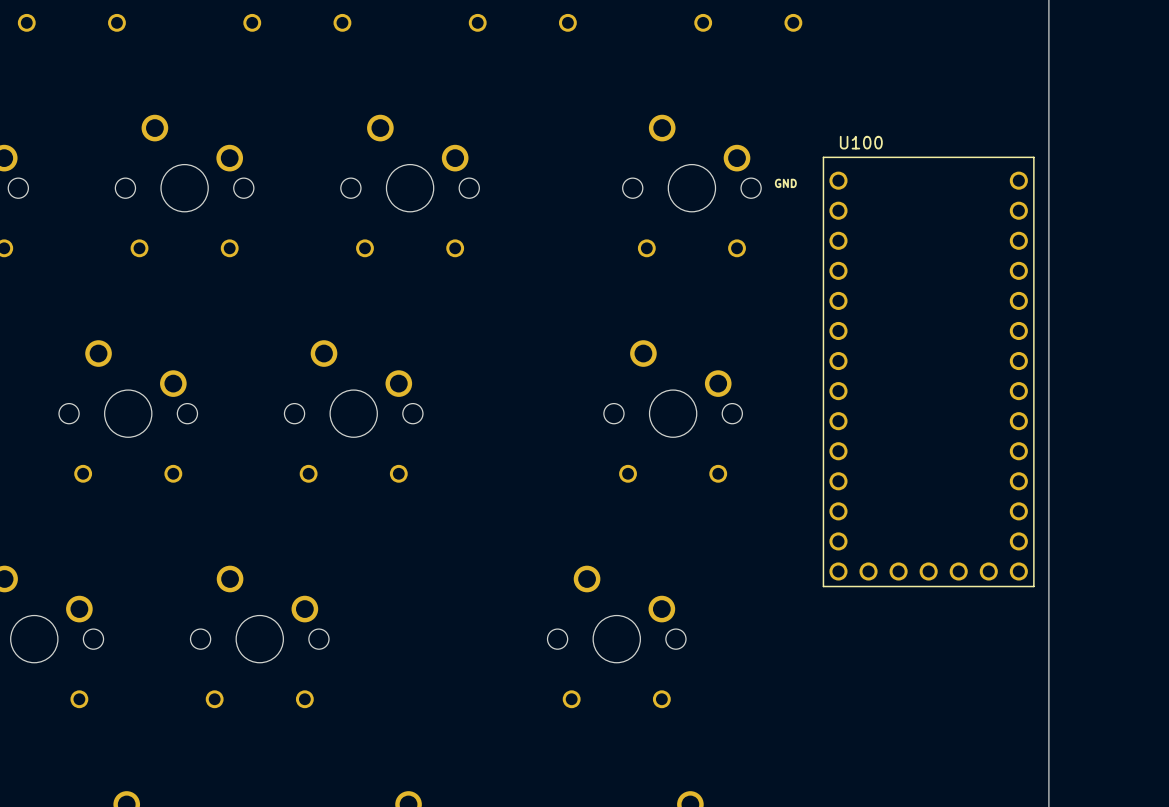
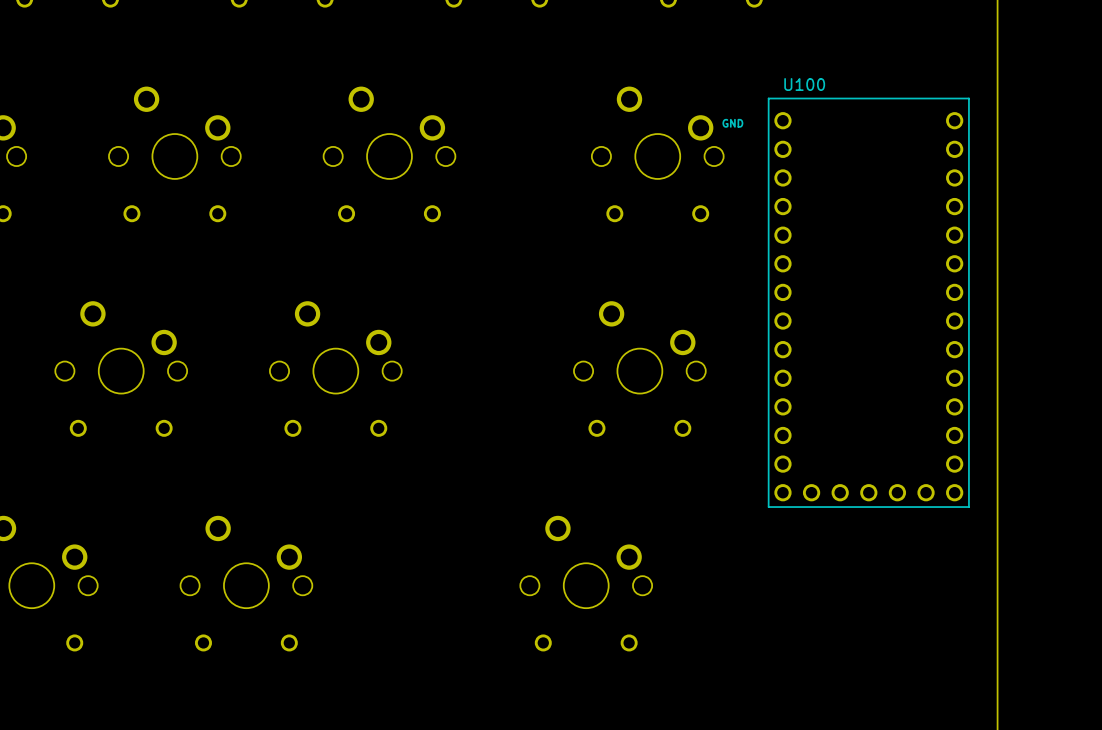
U100 position: (928, 371) -> (868, 302)

